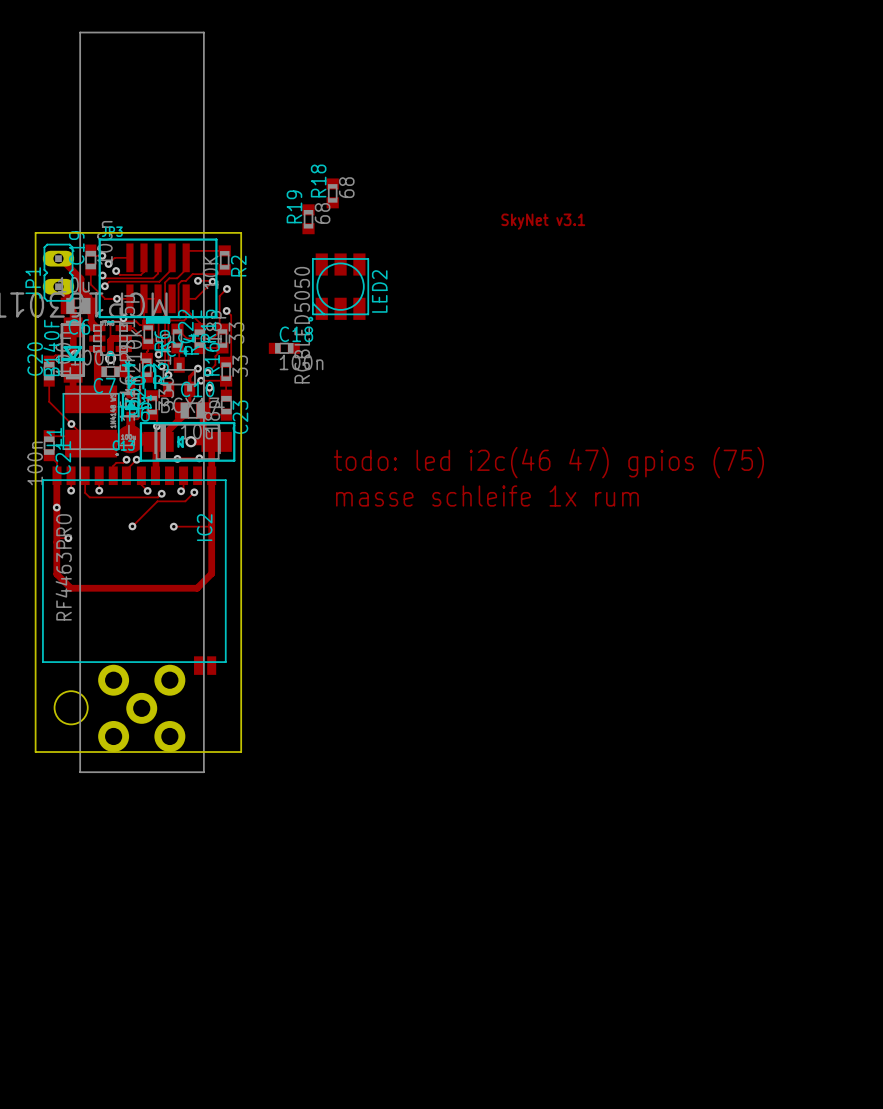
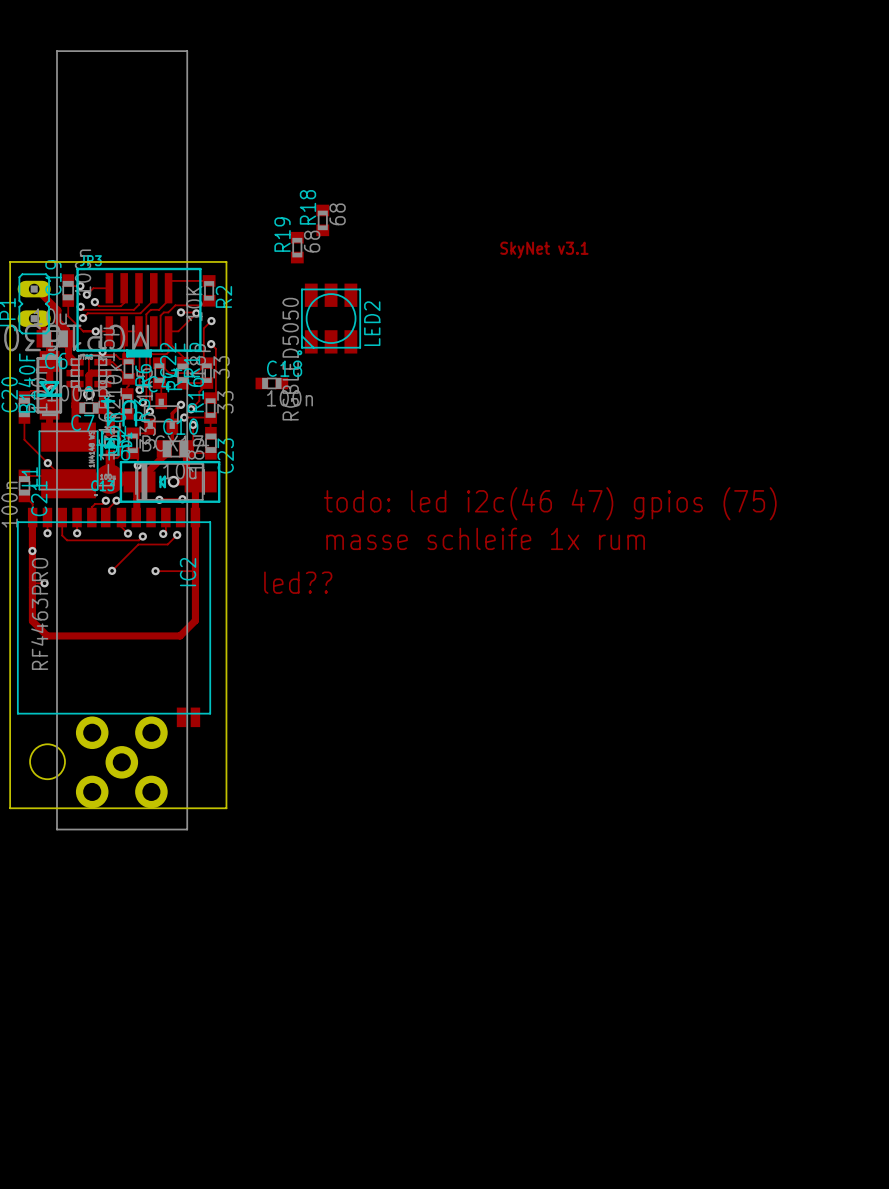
text: none -> led?? (298, 582)

